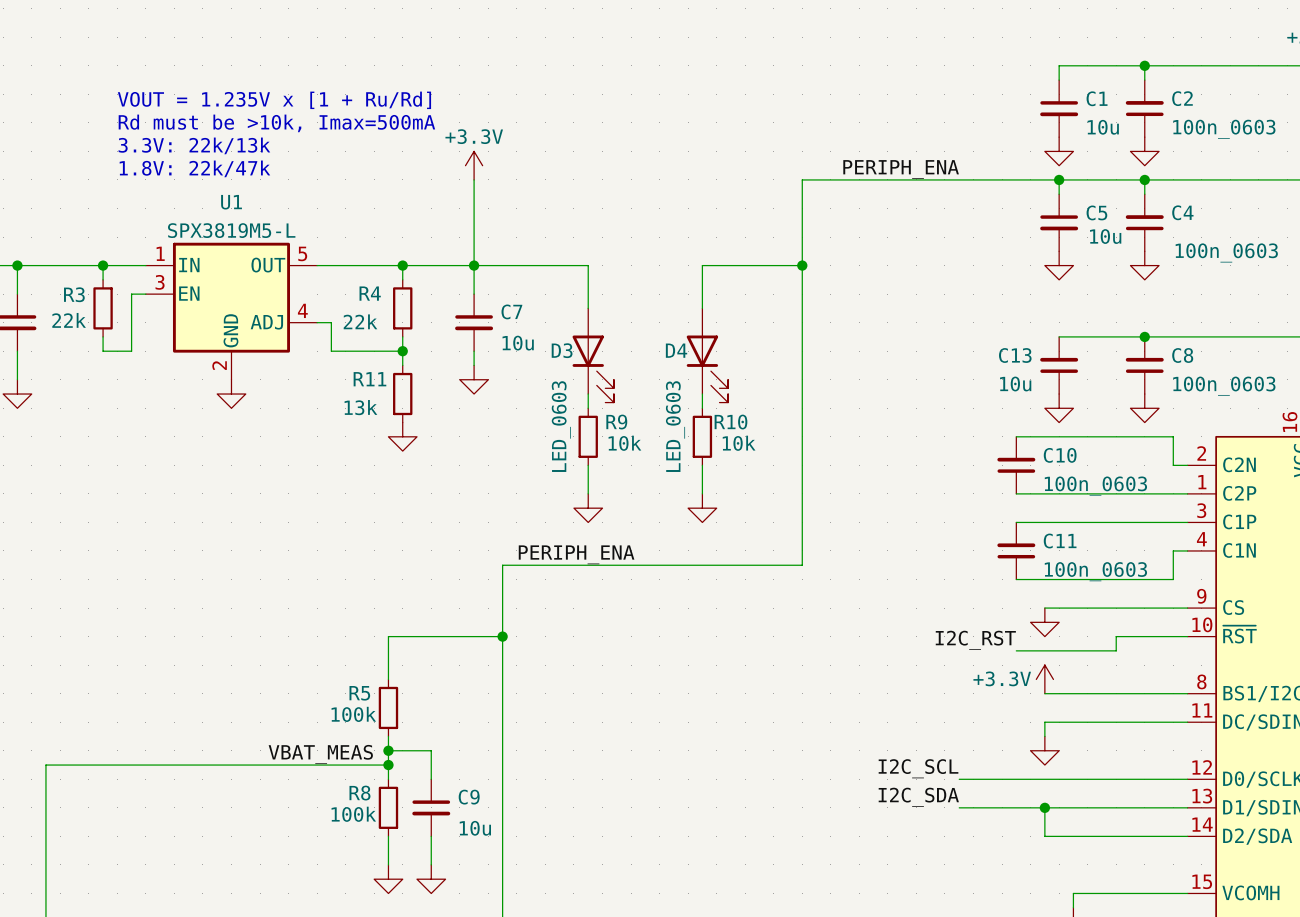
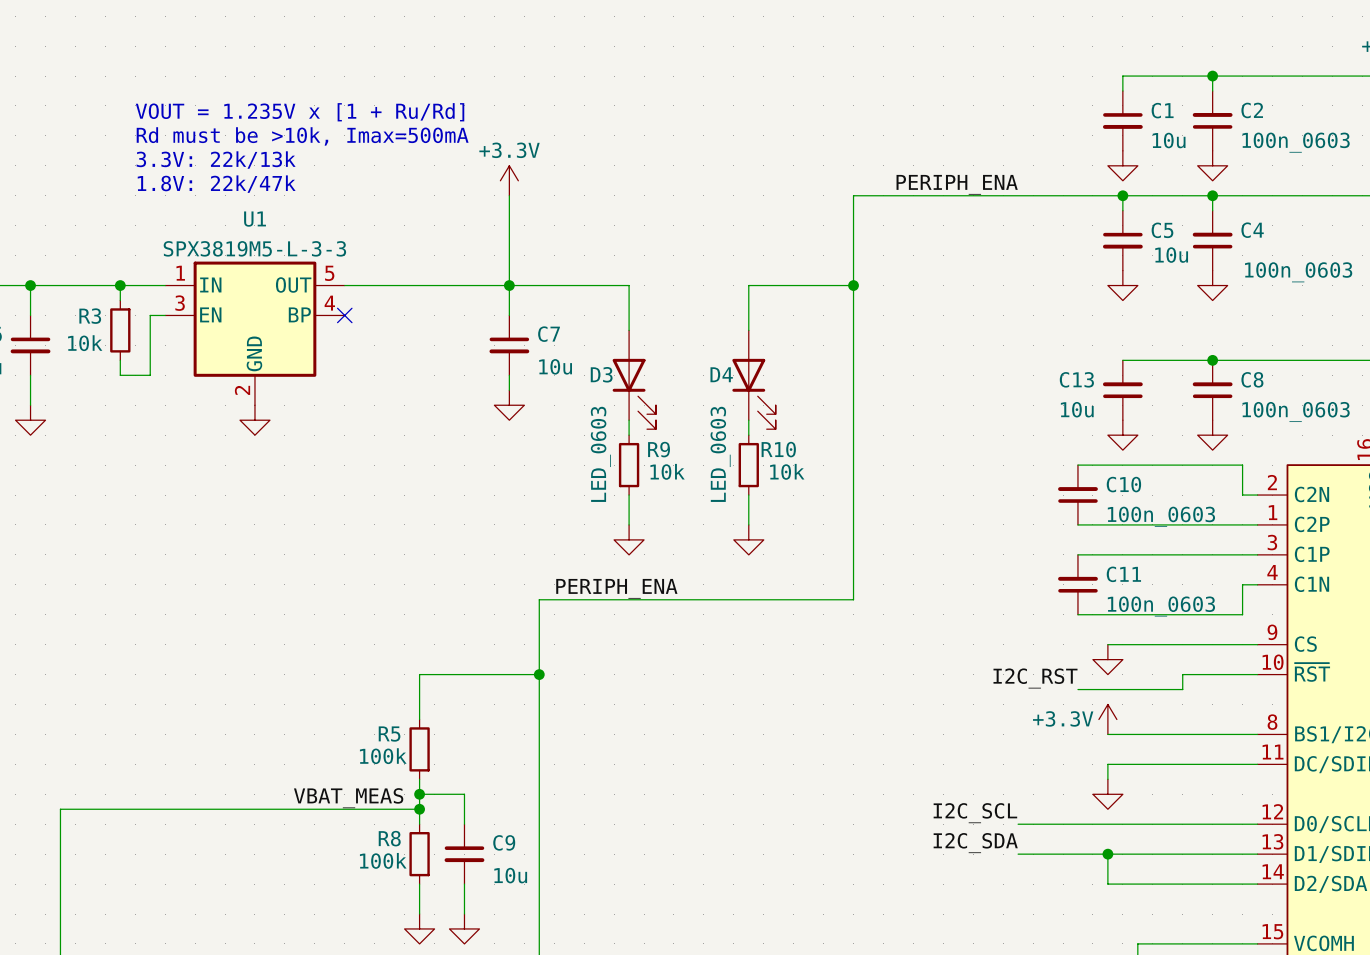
U1 value: SPX3819M5-L (231, 230) -> SPX3819M5-L-3-3 (254, 248)
U1 symbol: [145, 242, 318, 380] -> [165, 261, 345, 406]
wire: (402, 265) (402, 279) -> none
junction: (402, 265) -> none
no-connect mark: none -> (344, 315)
R4: 22k (402, 308) -> none
R3 value: 22k (69, 320) -> 10k (85, 343)
wire: (317, 322) (331, 322) (331, 351) (402, 351) -> none
wire: (402, 336) (402, 365) -> none
junction: (402, 351) -> none
R11: 13k (402, 394) -> none
power symbol: (402, 436) -> none

